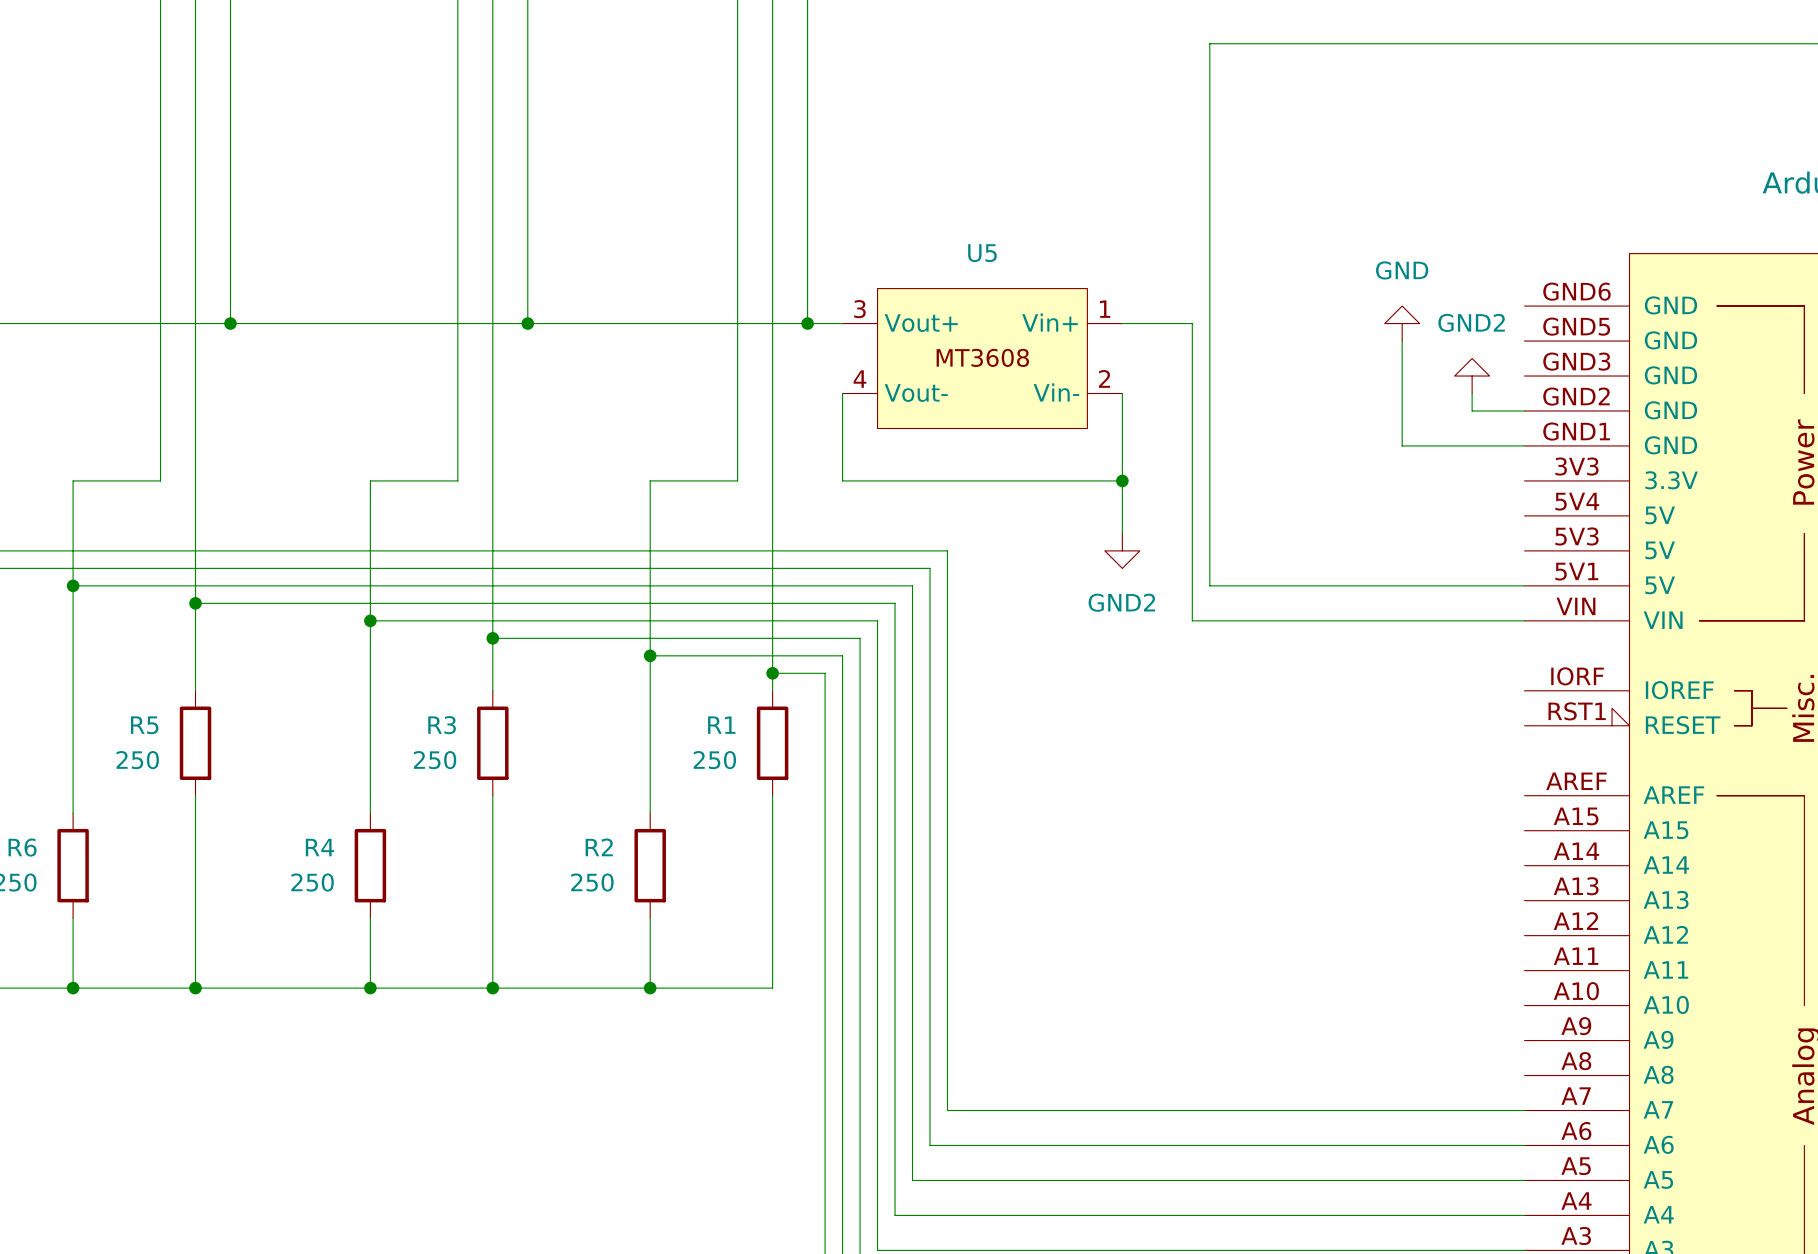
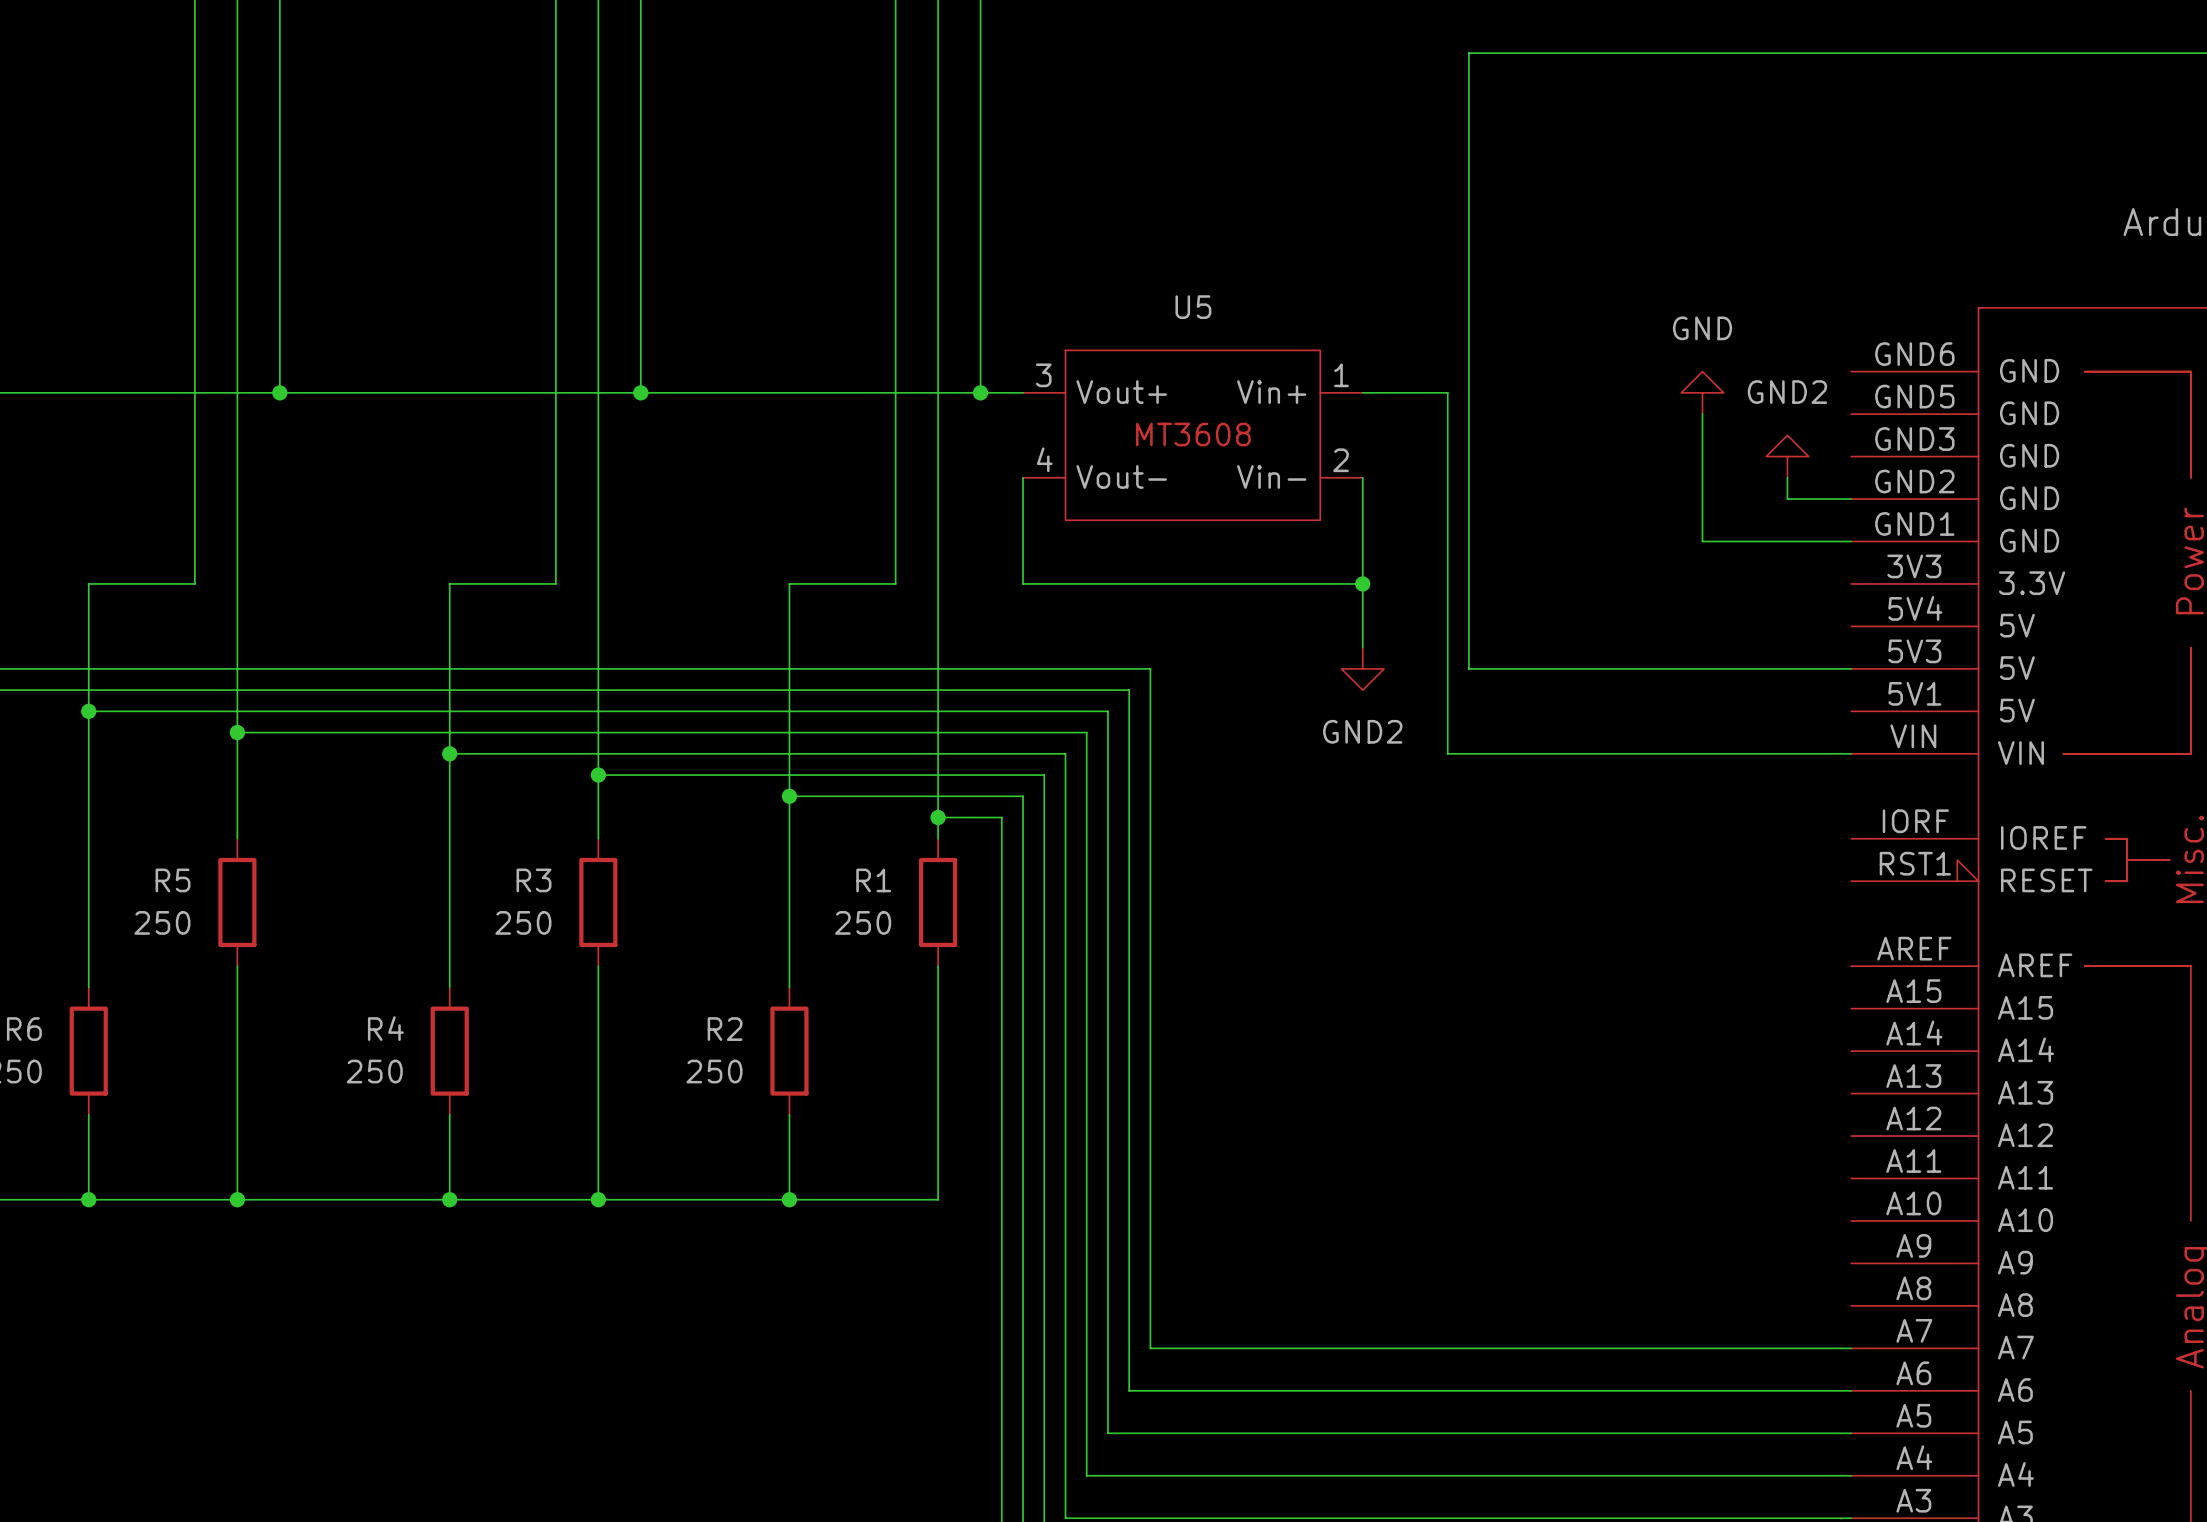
wire: (1209, 550) (1209, 585) (1524, 585) -> (1468, 668) (1851, 668)

